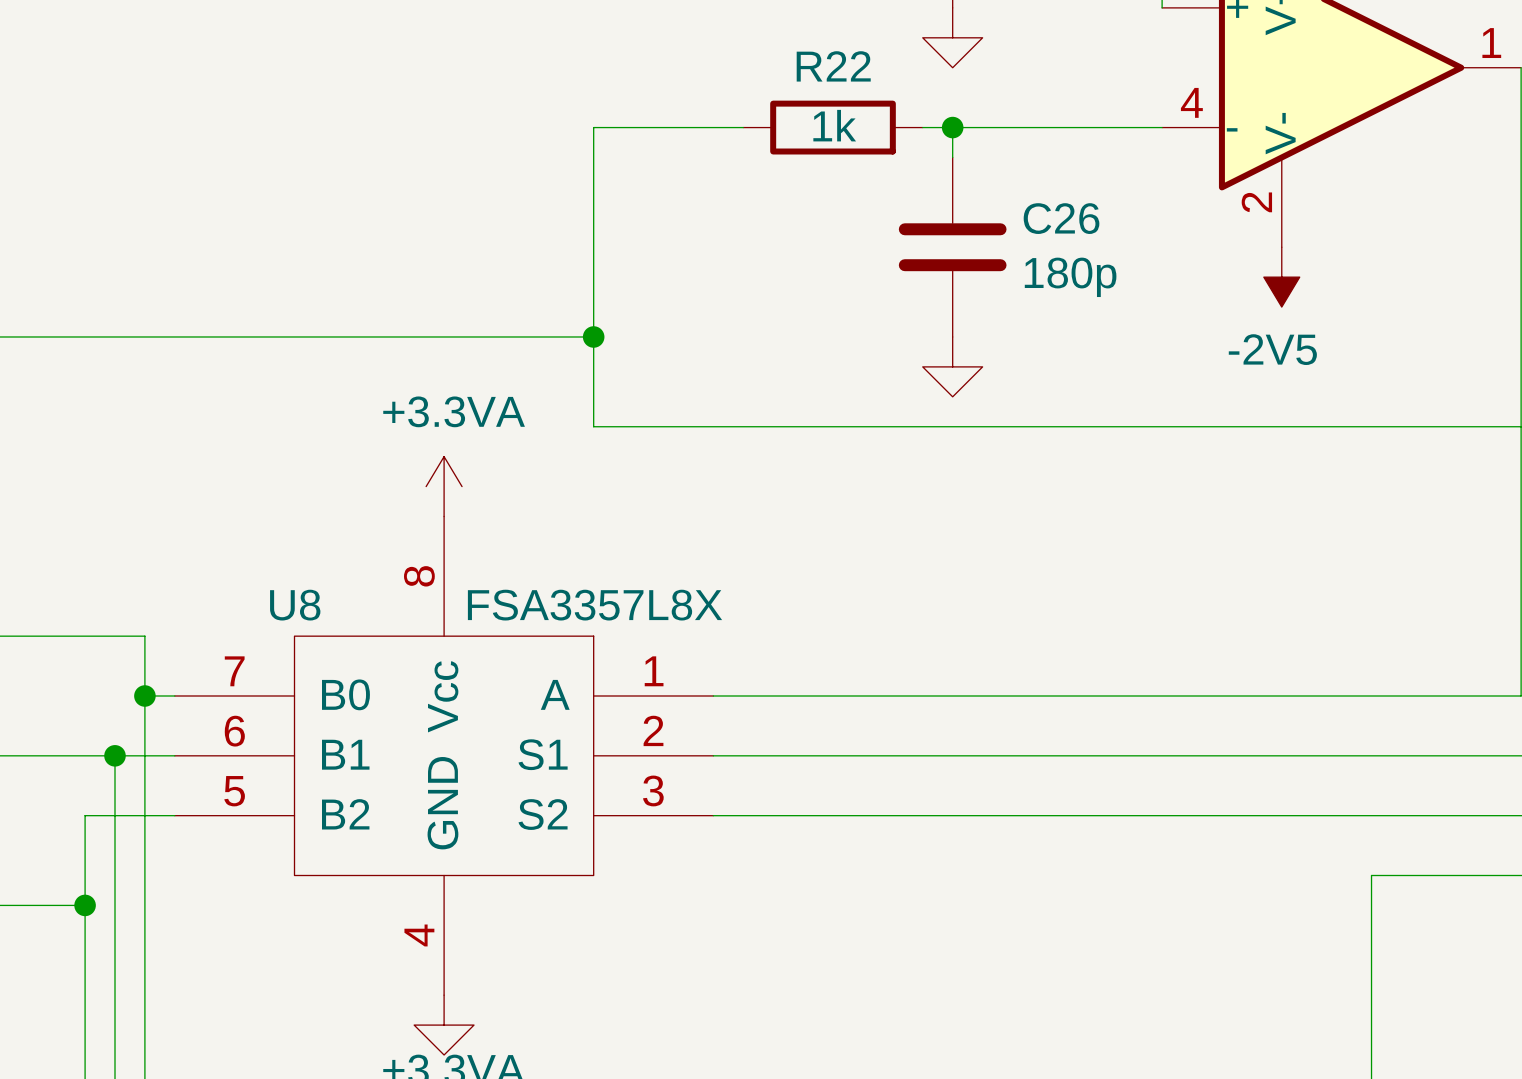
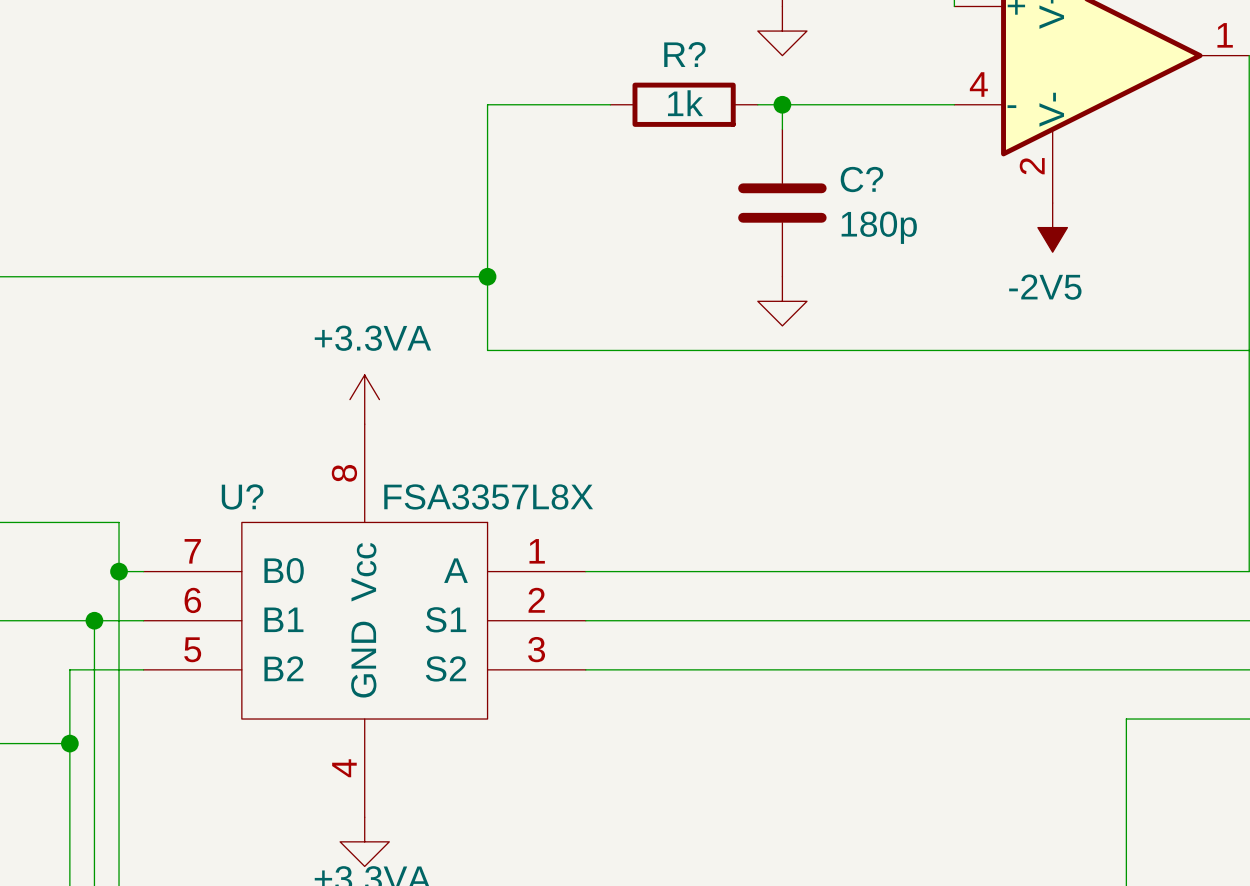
R22 name: R22 (833, 66) -> R? (684, 54)
C26 name: C26 (1061, 218) -> C? (861, 179)
U8 name: U8 (295, 605) -> U? (242, 496)

